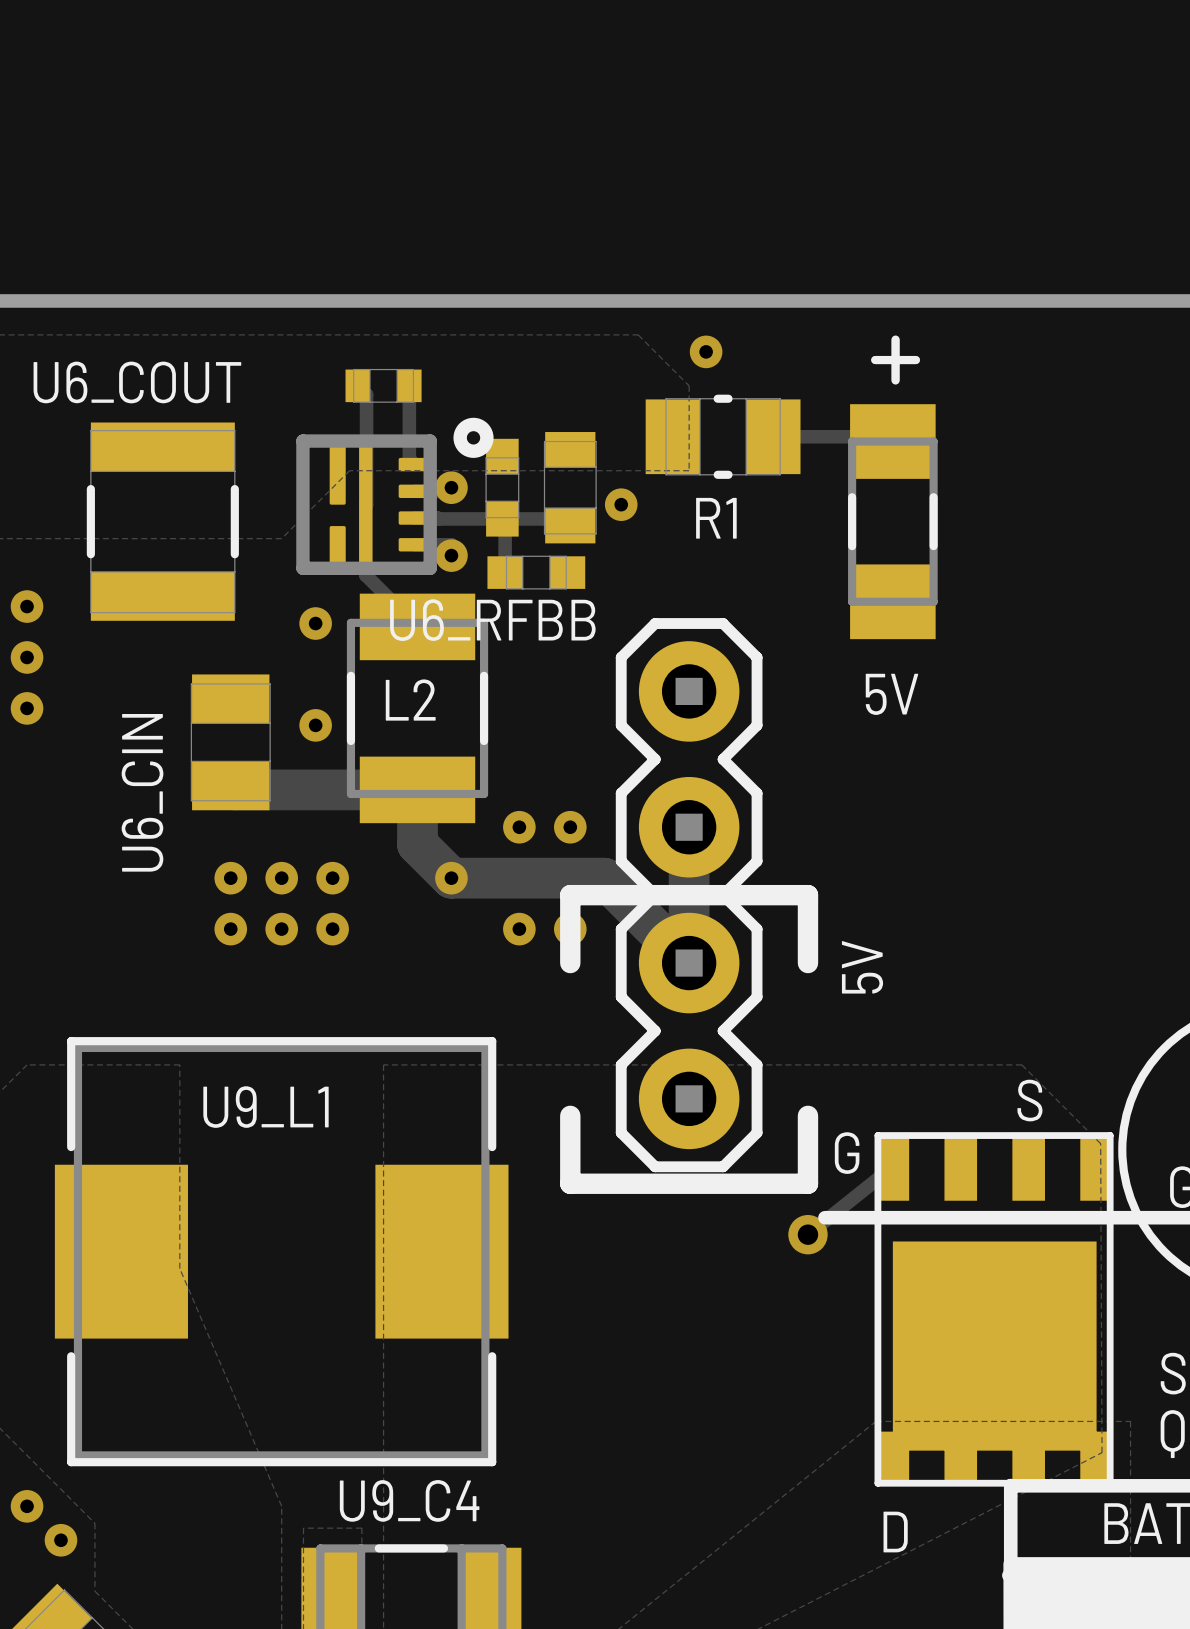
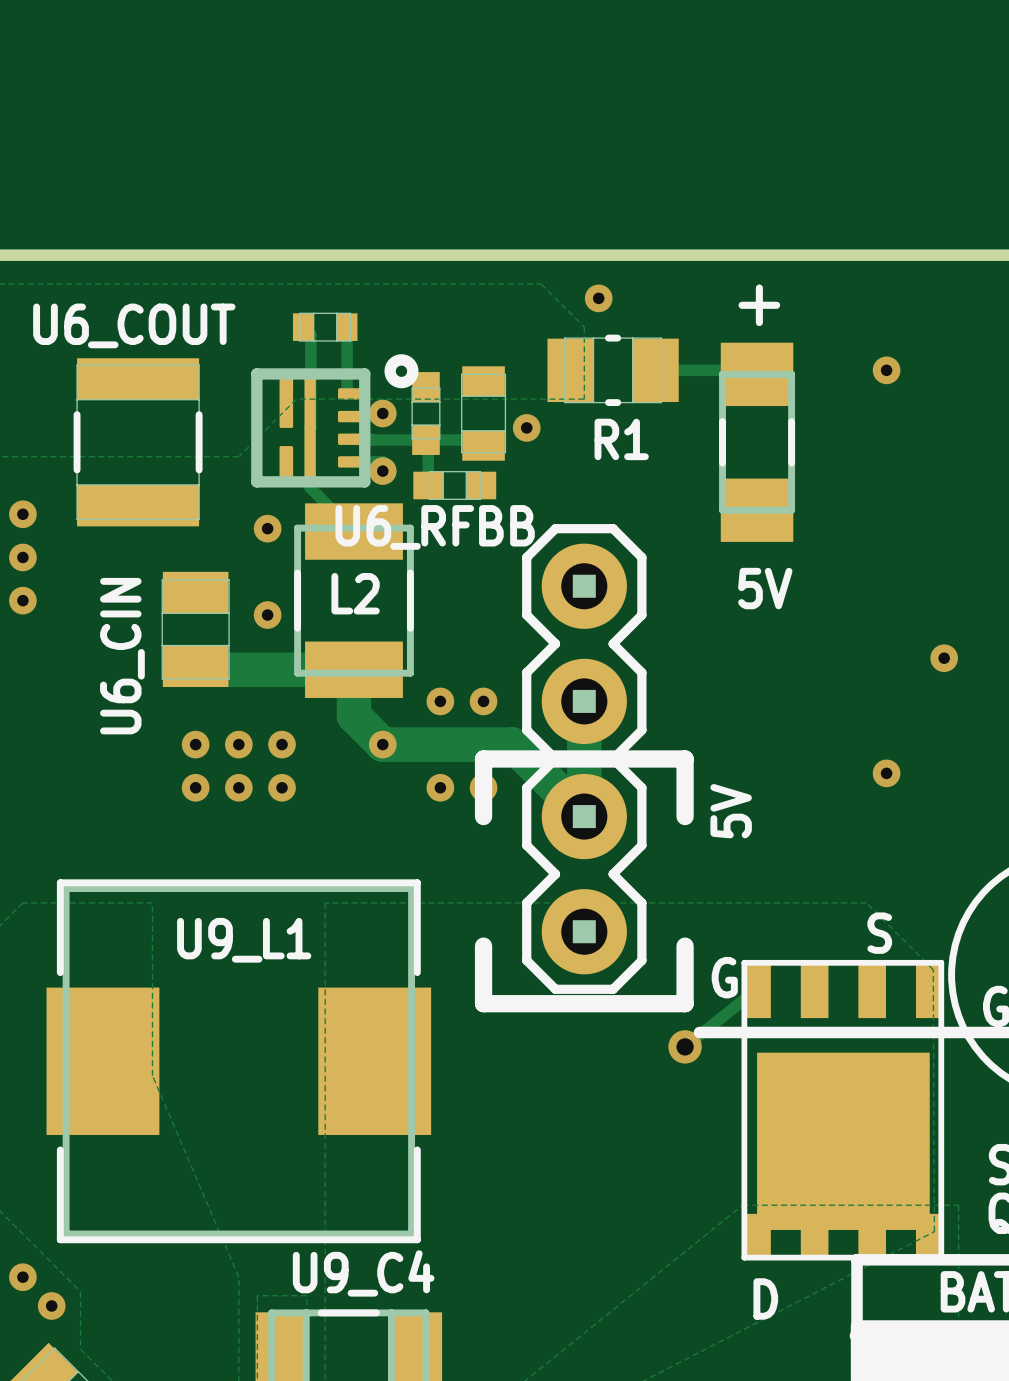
via: none -> (886, 370)
via: none -> (944, 658)
via: none -> (886, 773)

